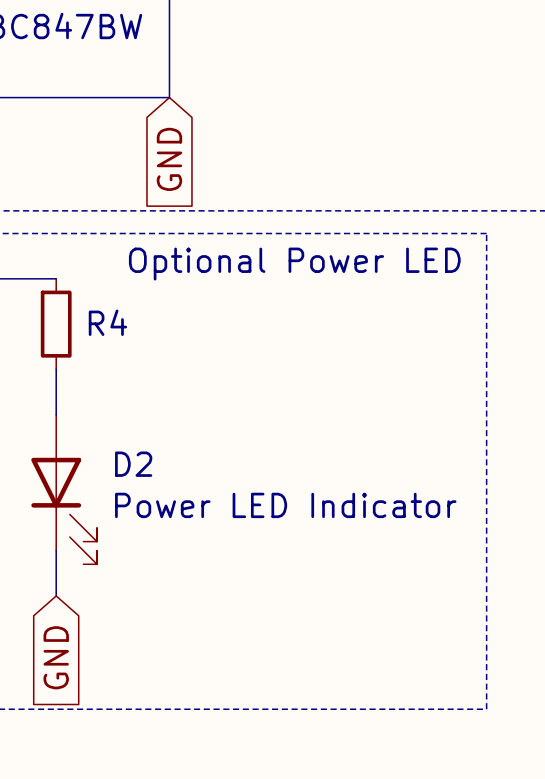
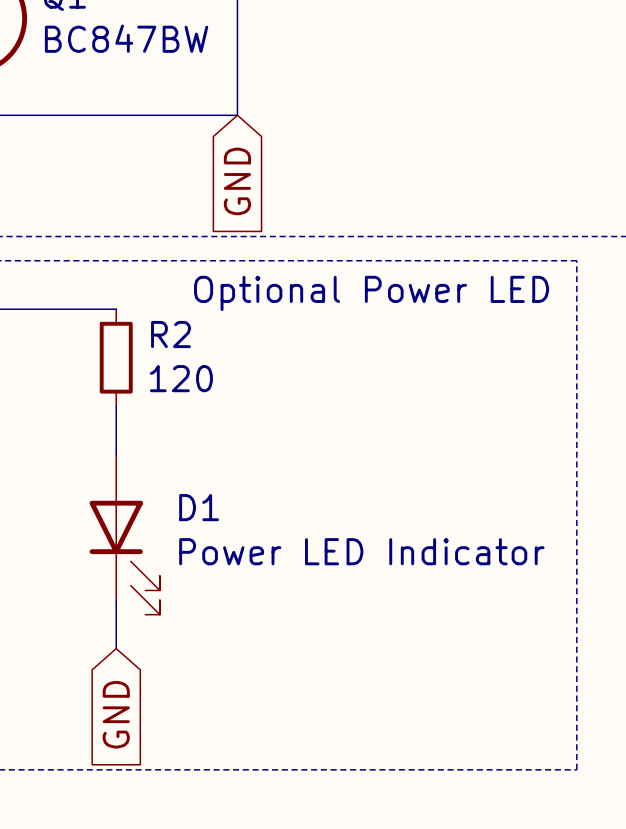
R4 name: R4 (107, 322) -> R2 (171, 334)
R4 value: none -> 120 (181, 378)
D2 name: D2 (133, 464) -> D1 (199, 507)

